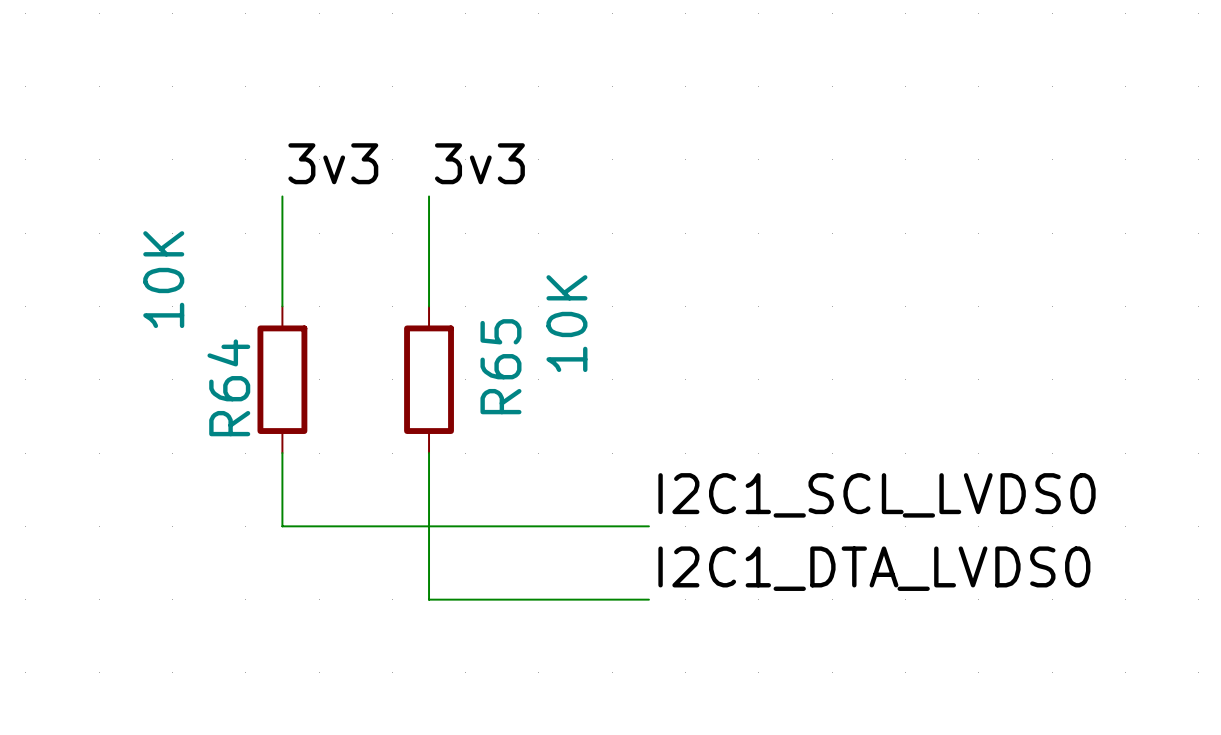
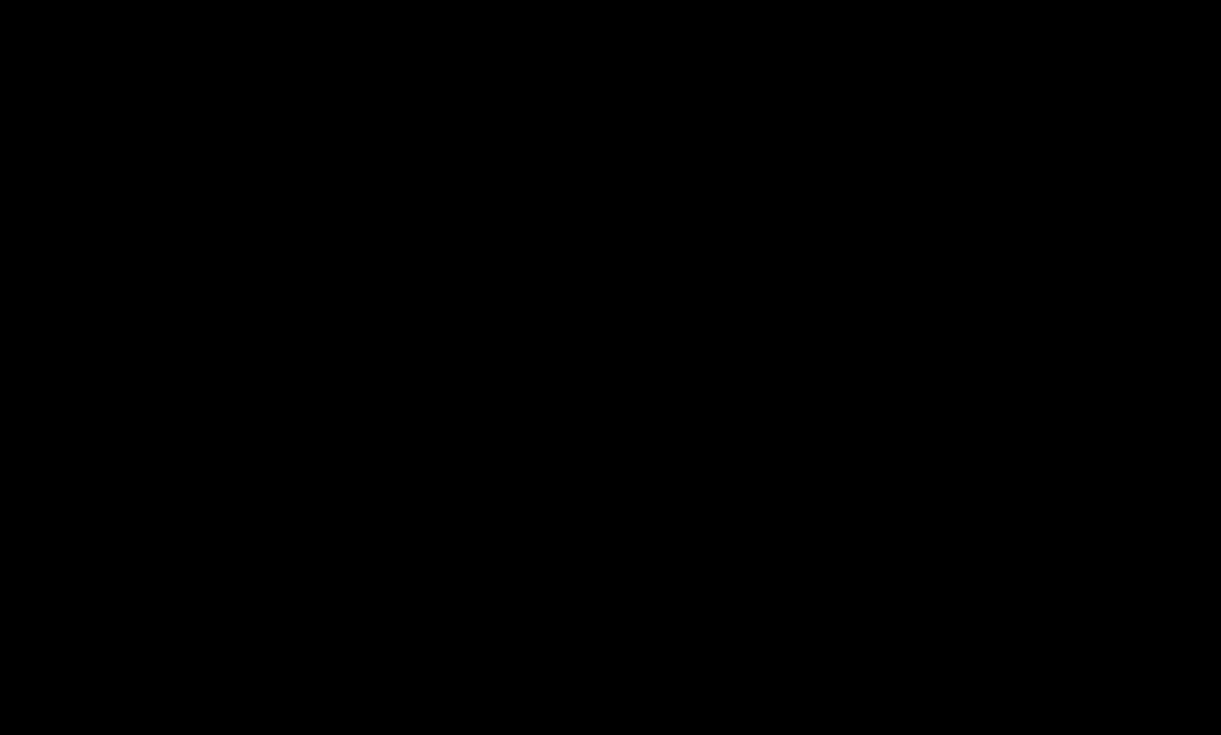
label: 3v3 (333, 163) -> none
label: 3v3 (479, 163) -> none
wire: (282, 196) (282, 306) -> none
wire: (429, 196) (429, 306) -> none
R64: 10K (282, 379) -> none
R65: 10K (429, 379) -> none
wire: (282, 453) (282, 526) (648, 526) -> none
wire: (429, 453) (429, 599) (648, 599) -> none
label: I2C1_SCL_LVDS0 (877, 495) -> none
label: I2C1_DTA_LVDS0 (874, 568) -> none

